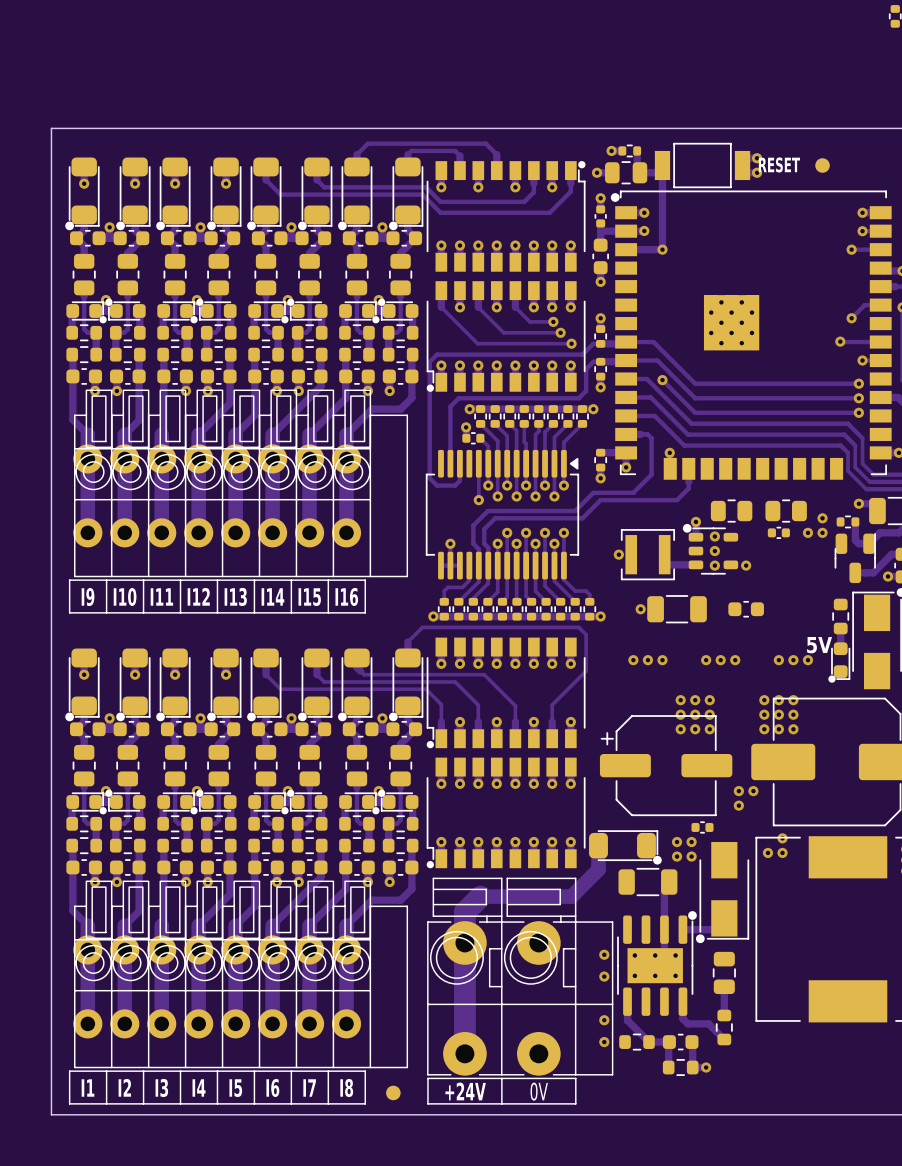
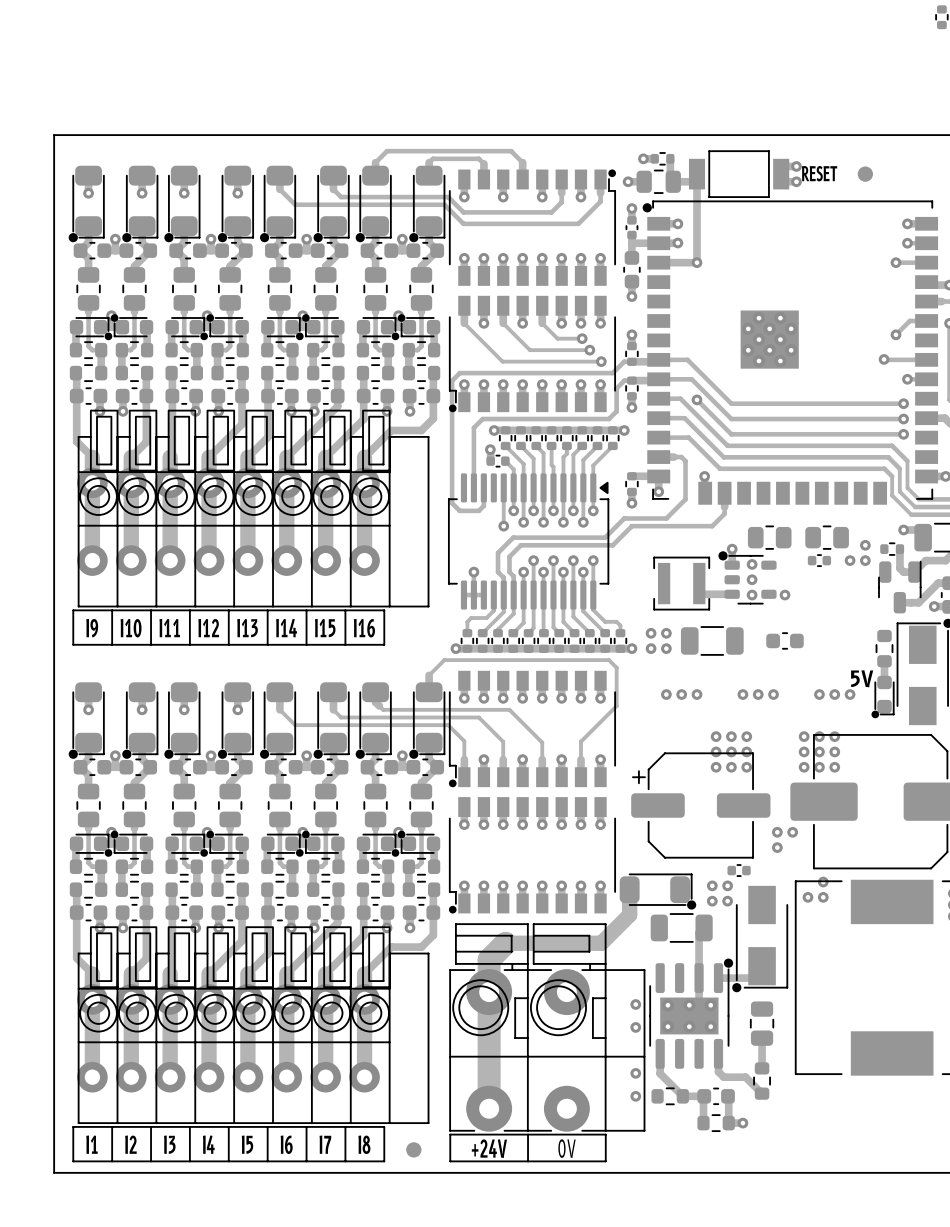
via: (618, 554) -> none
via: none -> (651, 633)
via: none -> (666, 633)
via: (640, 609) -> none
via: none -> (651, 648)
via: none -> (666, 648)

